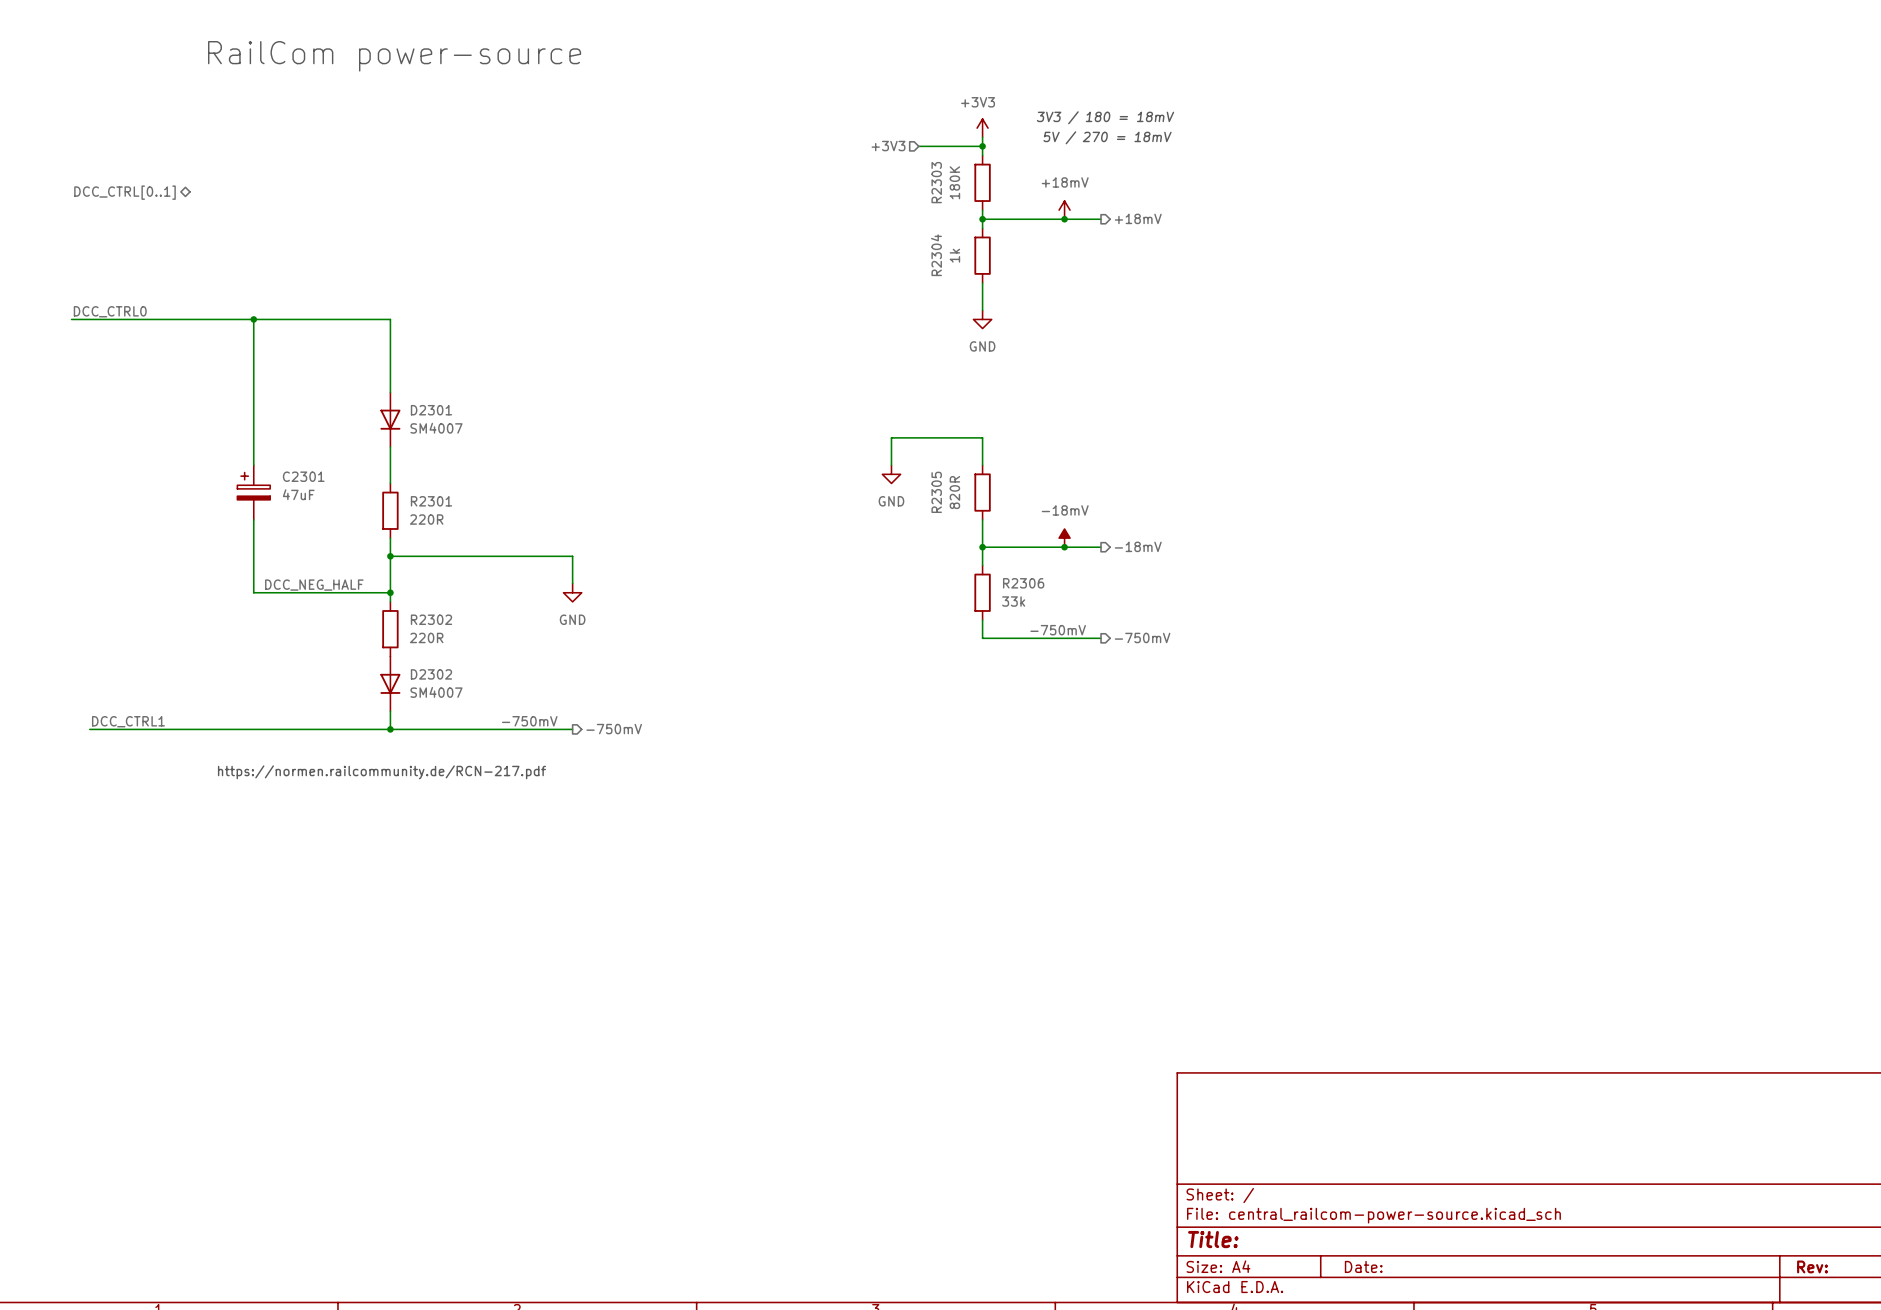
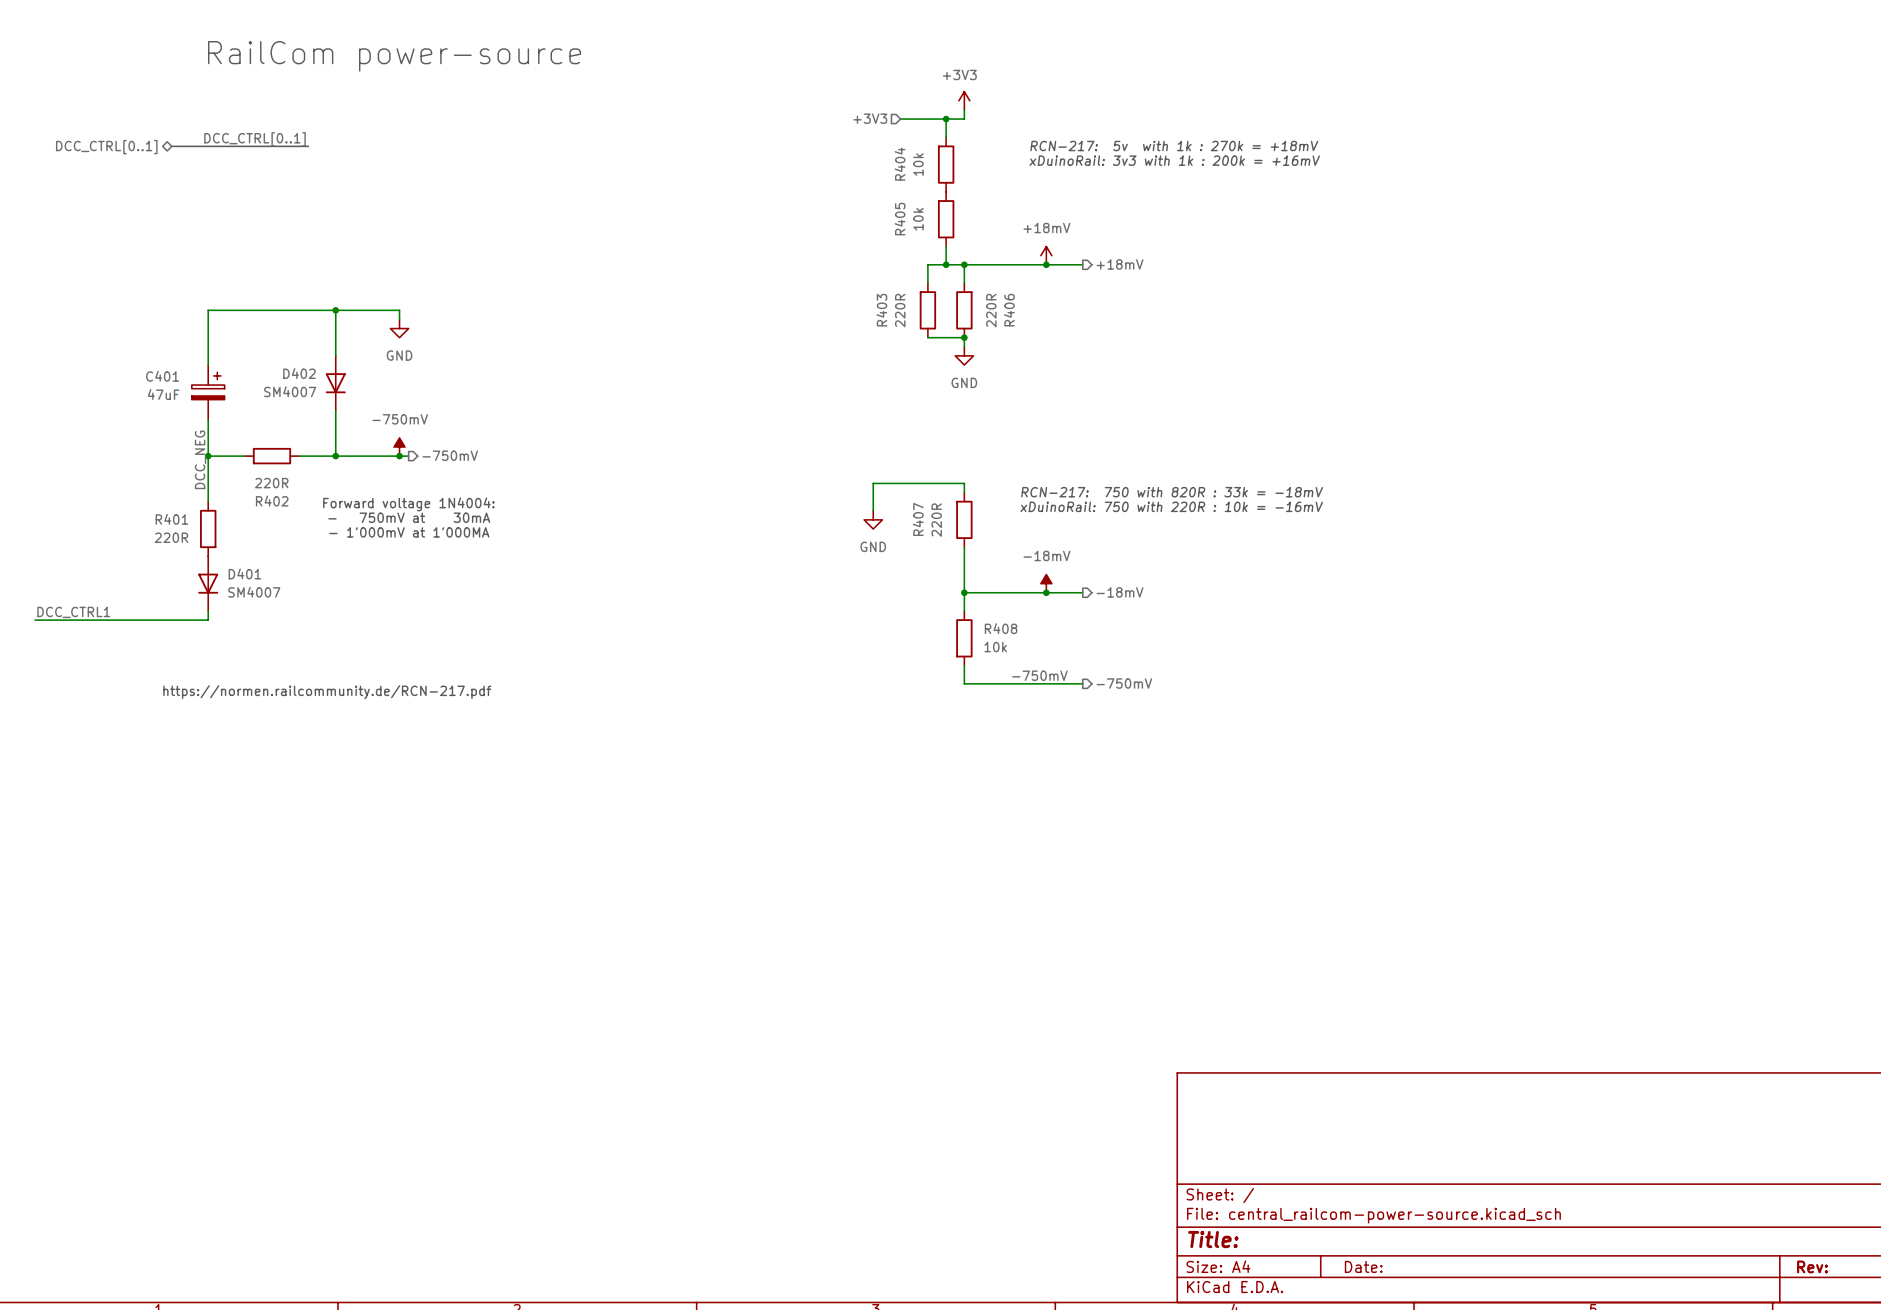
wire: none -> (964, 109) (964, 119) (900, 119)
text: 3V3 / 180 = 18mV (1105, 117) -> none
junction: none -> (946, 119)
power symbol position: +3V3 (982, 128) -> +3V3 (964, 100)
wire: (982, 137) (982, 155) -> (946, 119) (946, 137)
text: 5V / 270 = 18mV (1107, 137) -> none
label: none -> DCC_CTRL[0..1] (255, 139)
bus: none -> (171, 146) (308, 146)
hierarchical label position: +3V3 (888, 146) -> +3V3 (870, 118)
wire: (918, 146) (982, 146) -> none
junction: (982, 146) -> none
text: none -> RCN-217: 5v with 1k : 270k = +18mV (1174, 146)
text: none -> xDuinoRail: 3v3 with 1k : 200k = +16mV (1174, 160)
R404: none -> 10k (946, 164)
R2303: 180K (982, 182) -> none
hierarchical label position: DCC_CTRL[0..1] (124, 192) -> DCC_CTRL[0..1] (106, 147)
wire: (982, 210) (982, 228) -> (946, 246) (946, 264)
power symbol position: +18mV (1064, 210) -> +18mV (1046, 255)
hierarchical label position: +18mV (1138, 218) -> +18mV (1120, 264)
R405: none -> 10k (946, 219)
wire: (982, 219) (1101, 219) -> none
junction: (982, 219) -> none
junction: (1064, 219) -> none
R2304: 1k (982, 255) -> none
junction: none -> (946, 264)
wire: none -> (964, 264) (964, 283)
junction: none -> (964, 264)
junction: none -> (1046, 264)
wire: none -> (1082, 264) (927, 264) (927, 283)
wire: (982, 283) (982, 310) -> none
wire: none -> (335, 310) (335, 355)
junction: none -> (335, 310)
R403: none -> 220R (927, 310)
R406: none -> 220R (964, 310)
label: DCC_CTRL0 (110, 311) -> none
wire: (71, 319) (390, 319) (390, 392) -> none
wire: (253, 319) (253, 465) -> none
junction: (253, 319) -> none
wire: none -> (399, 319) (399, 310) (208, 310) (208, 365)
power symbol position: GND (982, 319) -> GND (964, 355)
power symbol: none -> GND (399, 328)
wire: none -> (927, 337) (964, 337) (964, 346)
junction: none -> (964, 337)
D402: none -> SM4007 (335, 383)
C401: none -> 47uF (208, 392)
wire: none -> (335, 410) (335, 456)
wire: none -> (208, 419) (208, 501)
D2301: SM4007 (390, 419) -> none
wire: (390, 447) (390, 483) -> none
power symbol: none -> -750mV (399, 447)
hierarchical label: none -> -750mV (450, 455)
wire: none -> (208, 456) (244, 456)
junction: none -> (208, 456)
R402: none -> 220R (271, 456)
wire: none -> (299, 456) (408, 456)
junction: none -> (335, 456)
junction: none -> (399, 456)
label: none -> DCC_NEG (200, 459)
wire: (891, 465) (891, 437) (982, 437) (982, 465) -> none
power symbol position: GND (891, 474) -> GND (873, 519)
C2301: 47uF (253, 492) -> none
wire: none -> (964, 492) (964, 483) (873, 483) (873, 510)
R2305: 820R (982, 492) -> none
text: none -> RCN-217: 750 with 820R : 33k = -18mV (1172, 492)
text: none -> Forward voltage 1N4004: (408, 504)
text: none -> xDuinoRail: 750 with 220R : 10k = -16mV (1171, 506)
R2301: 220R (390, 510) -> none
text: none -> - 750mV at 30mA (409, 517)
wire: (253, 519) (253, 592) (390, 592) -> none
R407: none -> 220R (964, 519)
wire: (982, 519) (982, 565) -> none
R401: none -> 220R (208, 528)
text: none -> - 1'000mV at 1'000MA (409, 532)
wire: (390, 538) (390, 601) -> none
power symbol position: -18mV (1064, 538) -> -18mV (1046, 583)
hierarchical label position: -18mV (1138, 546) -> -18mV (1120, 592)
wire: none -> (964, 547) (964, 610)
wire: (982, 547) (1101, 547) -> (964, 592) (1082, 592)
junction: (982, 547) -> none
junction: (1064, 547) -> none
wire: (390, 556) (572, 556) (572, 583) -> none
junction: (390, 556) -> none
D401: none -> SM4007 (208, 583)
label: DCC_NEG_HALF (314, 585) -> none
junction: (390, 592) -> none
power symbol: GND (572, 592) -> none
junction: none -> (964, 592)
R2306: 33k (982, 592) -> none
junction: none -> (1046, 592)
wire: none -> (208, 610) (208, 620) (35, 620)
wire: (982, 620) (982, 638) (1101, 638) -> (964, 665) (964, 683) (1082, 683)
R2302: 220R (390, 629) -> none
label position: -750mV (1058, 630) -> -750mV (1039, 675)
hierarchical label position: -750mV (1142, 637) -> -750mV (1124, 683)
R408: none -> 10k (964, 638)
D2302: SM4007 (390, 683) -> none
wire: (390, 711) (390, 729) -> none
label position: DCC_CTRL1 (128, 721) -> DCC_CTRL1 (73, 612)
label: -750mV (529, 721) -> none
wire: (89, 729) (572, 729) -> none
junction: (390, 729) -> none
hierarchical label: -750mV (614, 729) -> none
text position: https://normen.railcommunity.de/RCN-217.pdf (381, 772) -> https://normen.railcommunity.de/RCN-217.pdf (327, 692)

